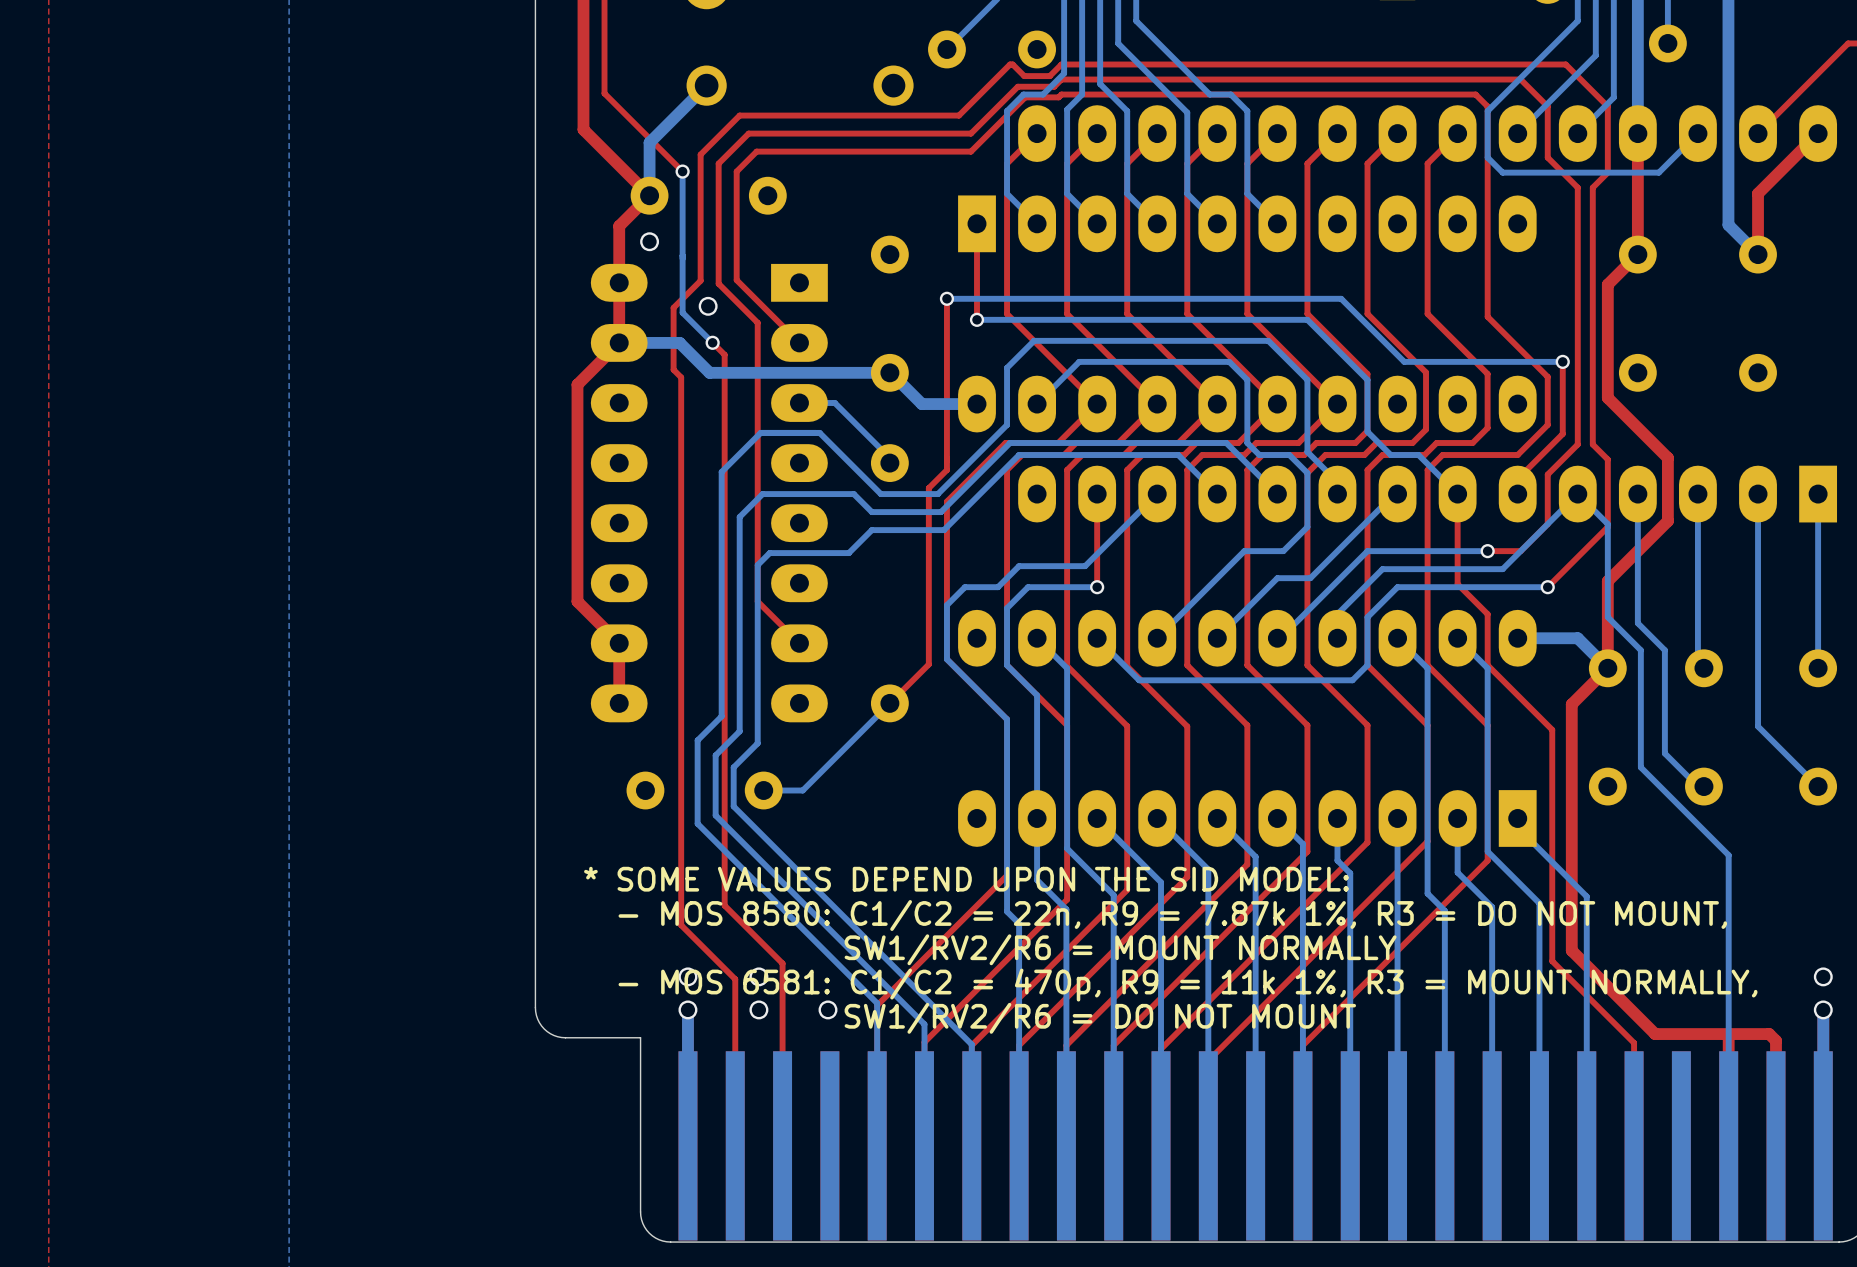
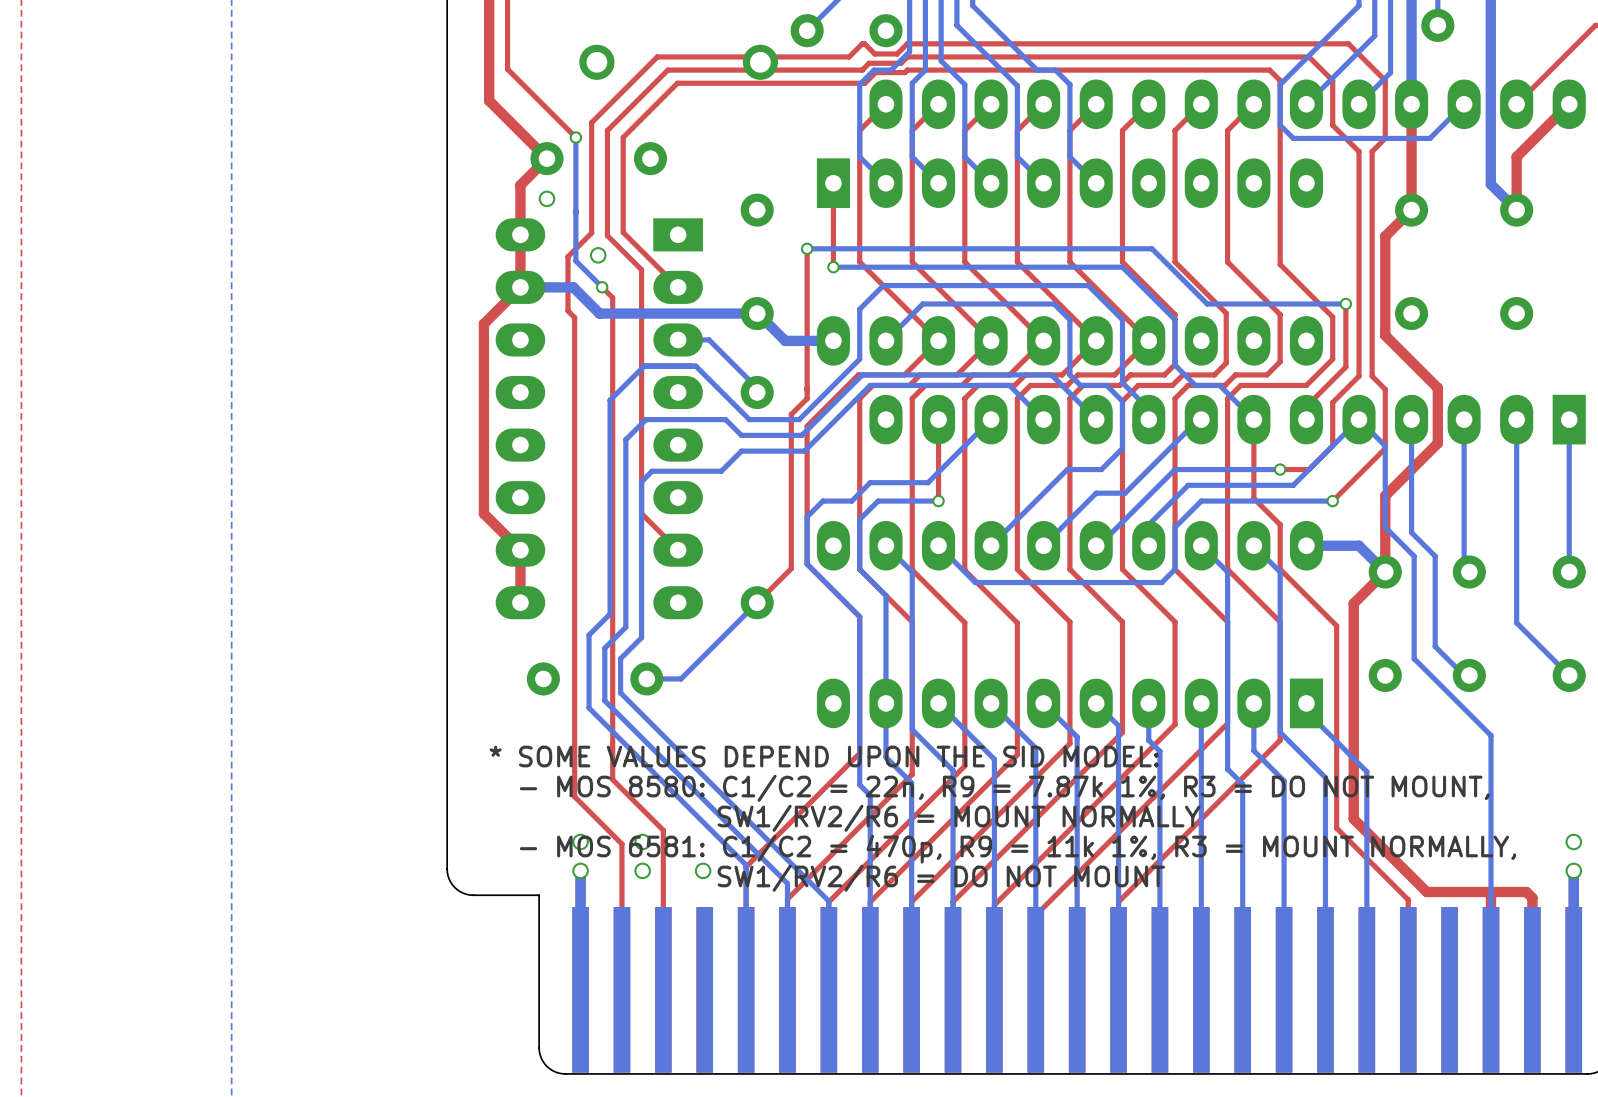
top track: (995, 79) (958, 115) (739, 115) -> (849, 56) (657, 56) (625, 88)
bottom track: (706, 85) (649, 142) (649, 195) -> none
top track: (1010, 94) (970, 133) (748, 133) -> (862, 70) (667, 70) (633, 104)
top track: (1013, 109) (970, 151) (756, 151) -> (864, 83) (677, 83) (640, 120)

